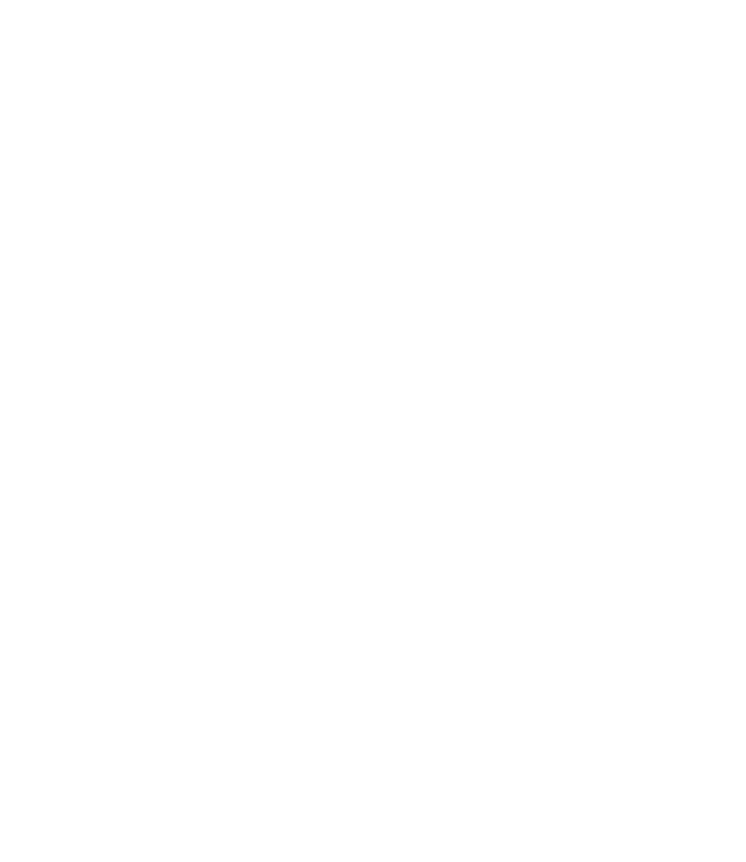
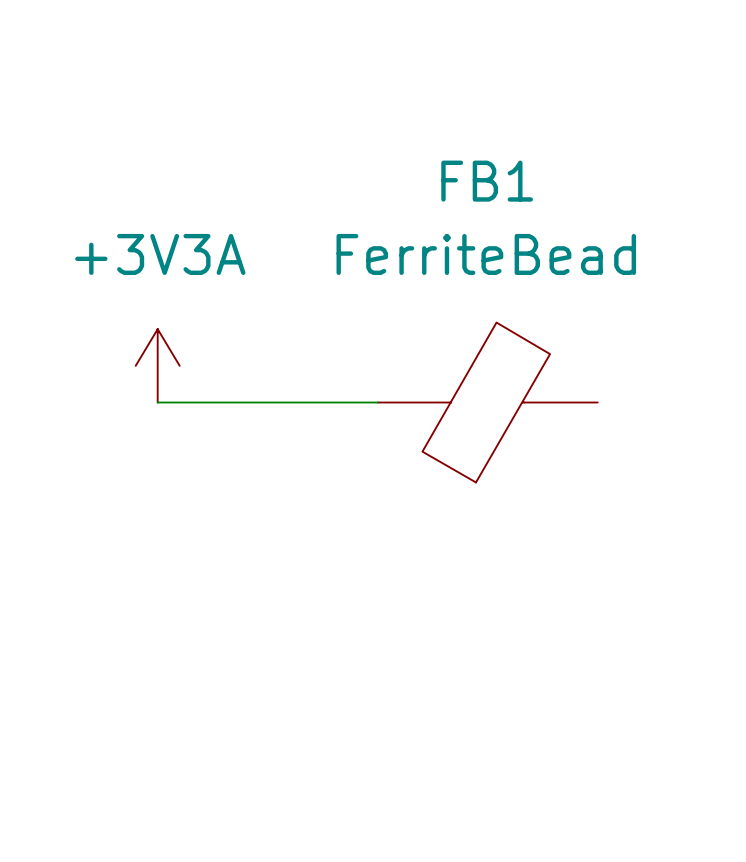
power symbol: none -> +3V3A (157, 365)
wire: none -> (157, 402) (377, 402)
FB1: none -> FerriteBead (487, 402)

